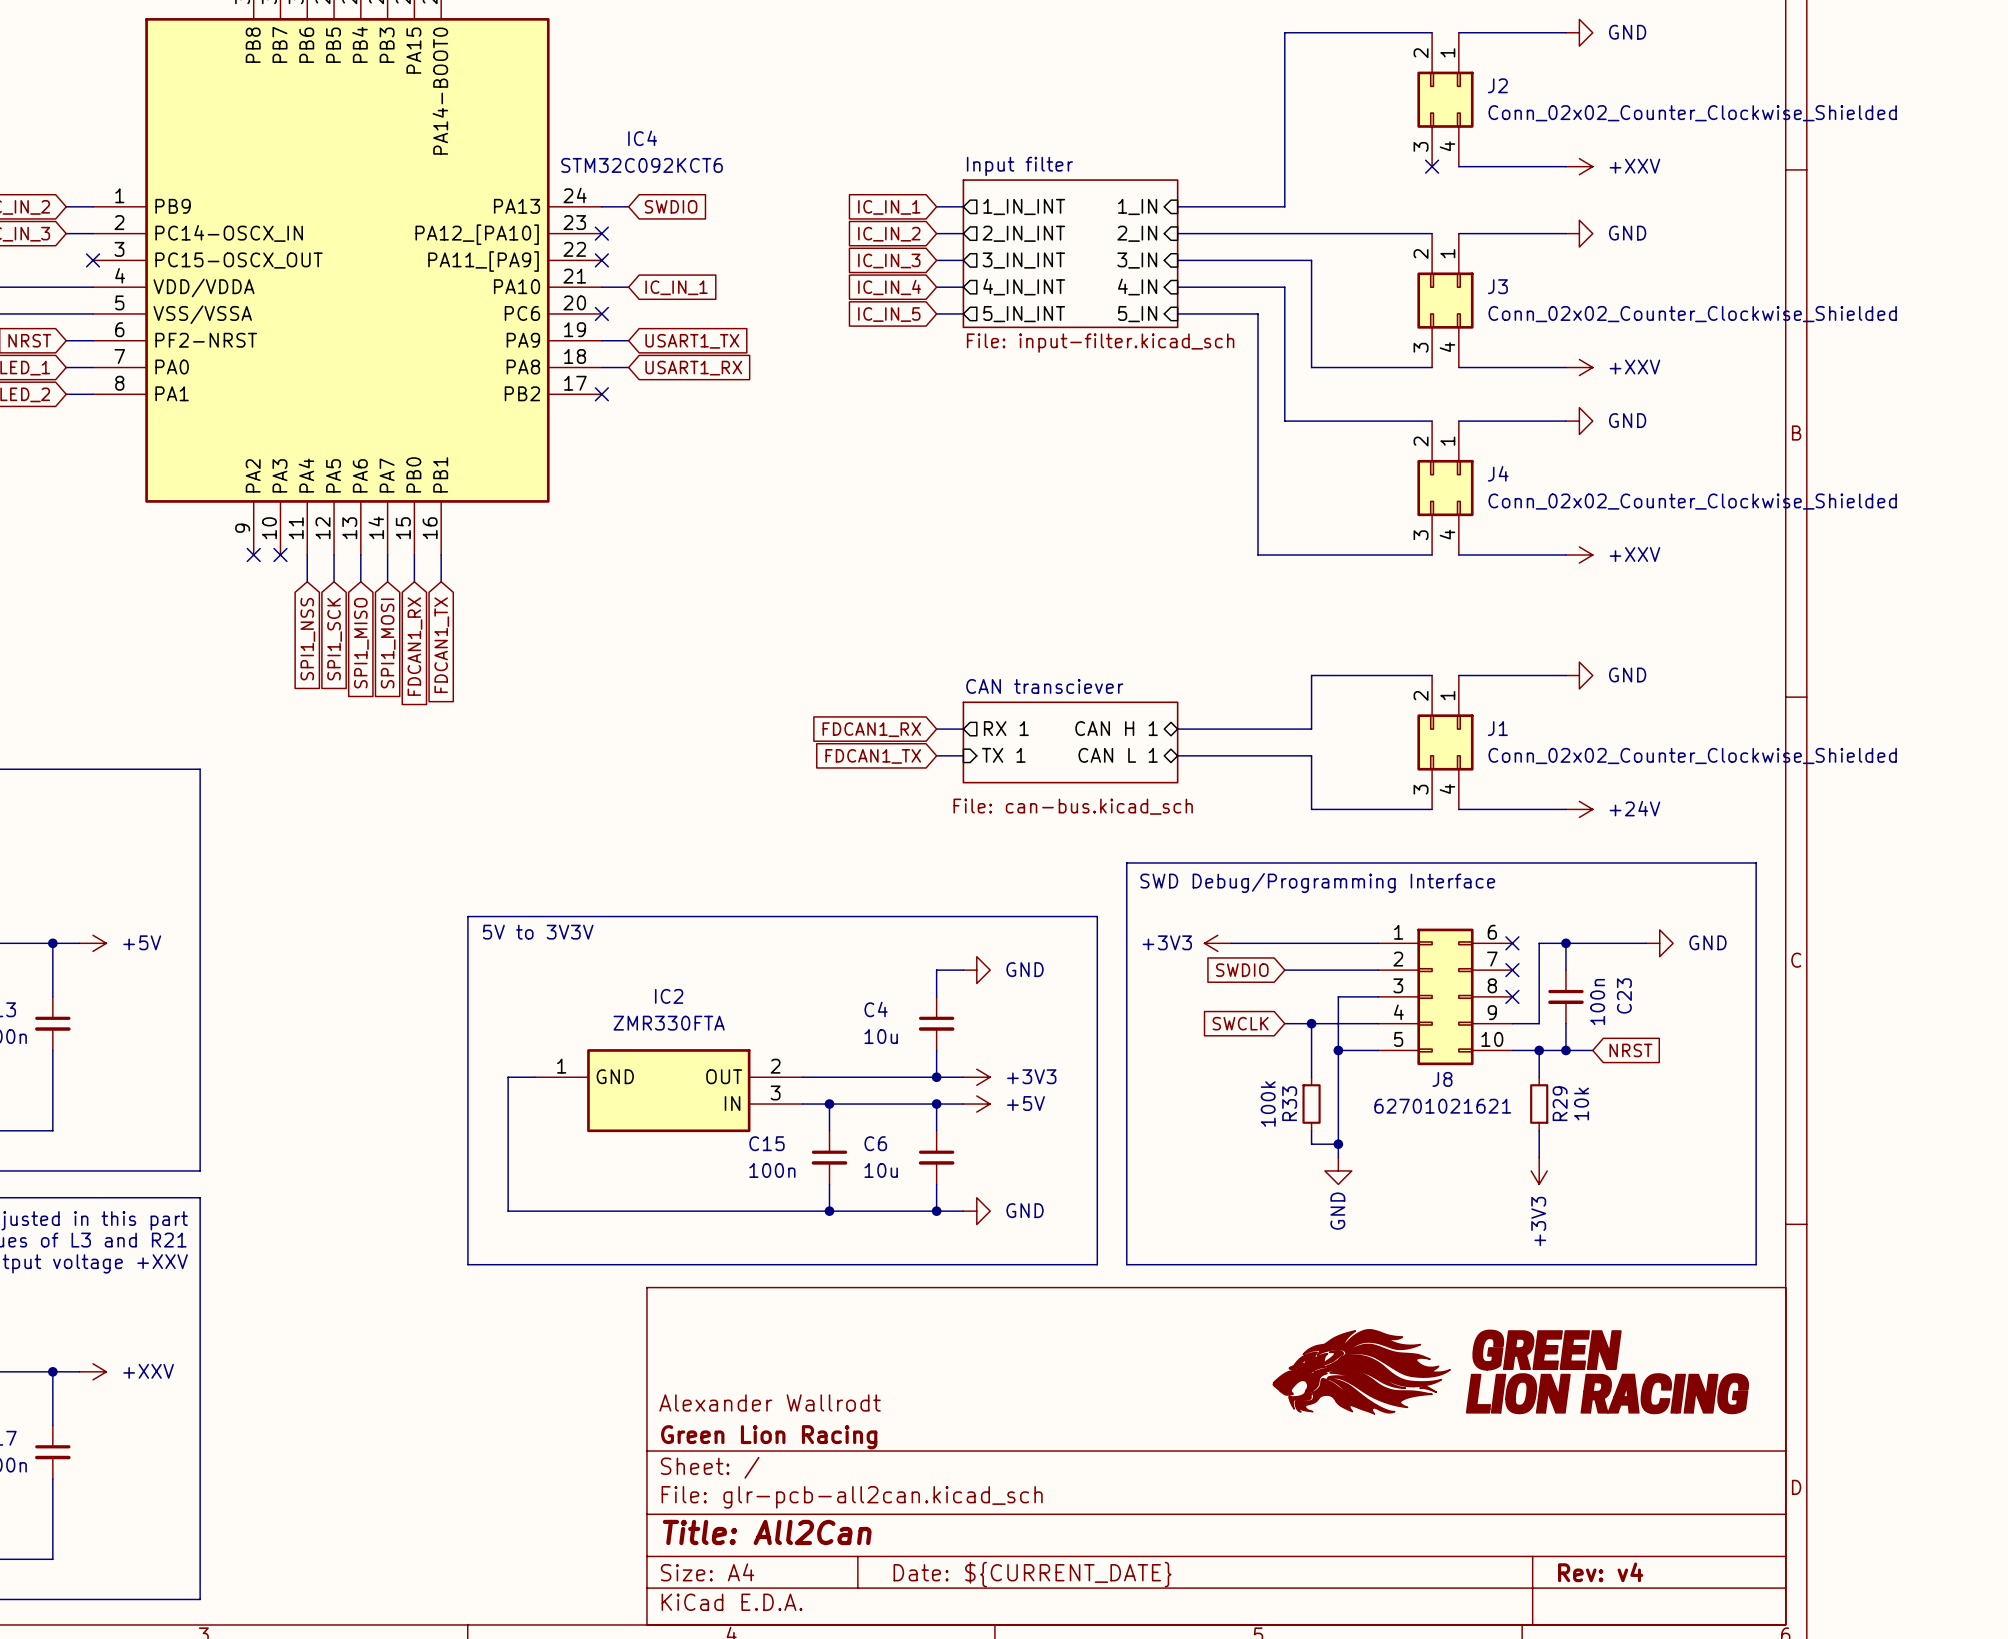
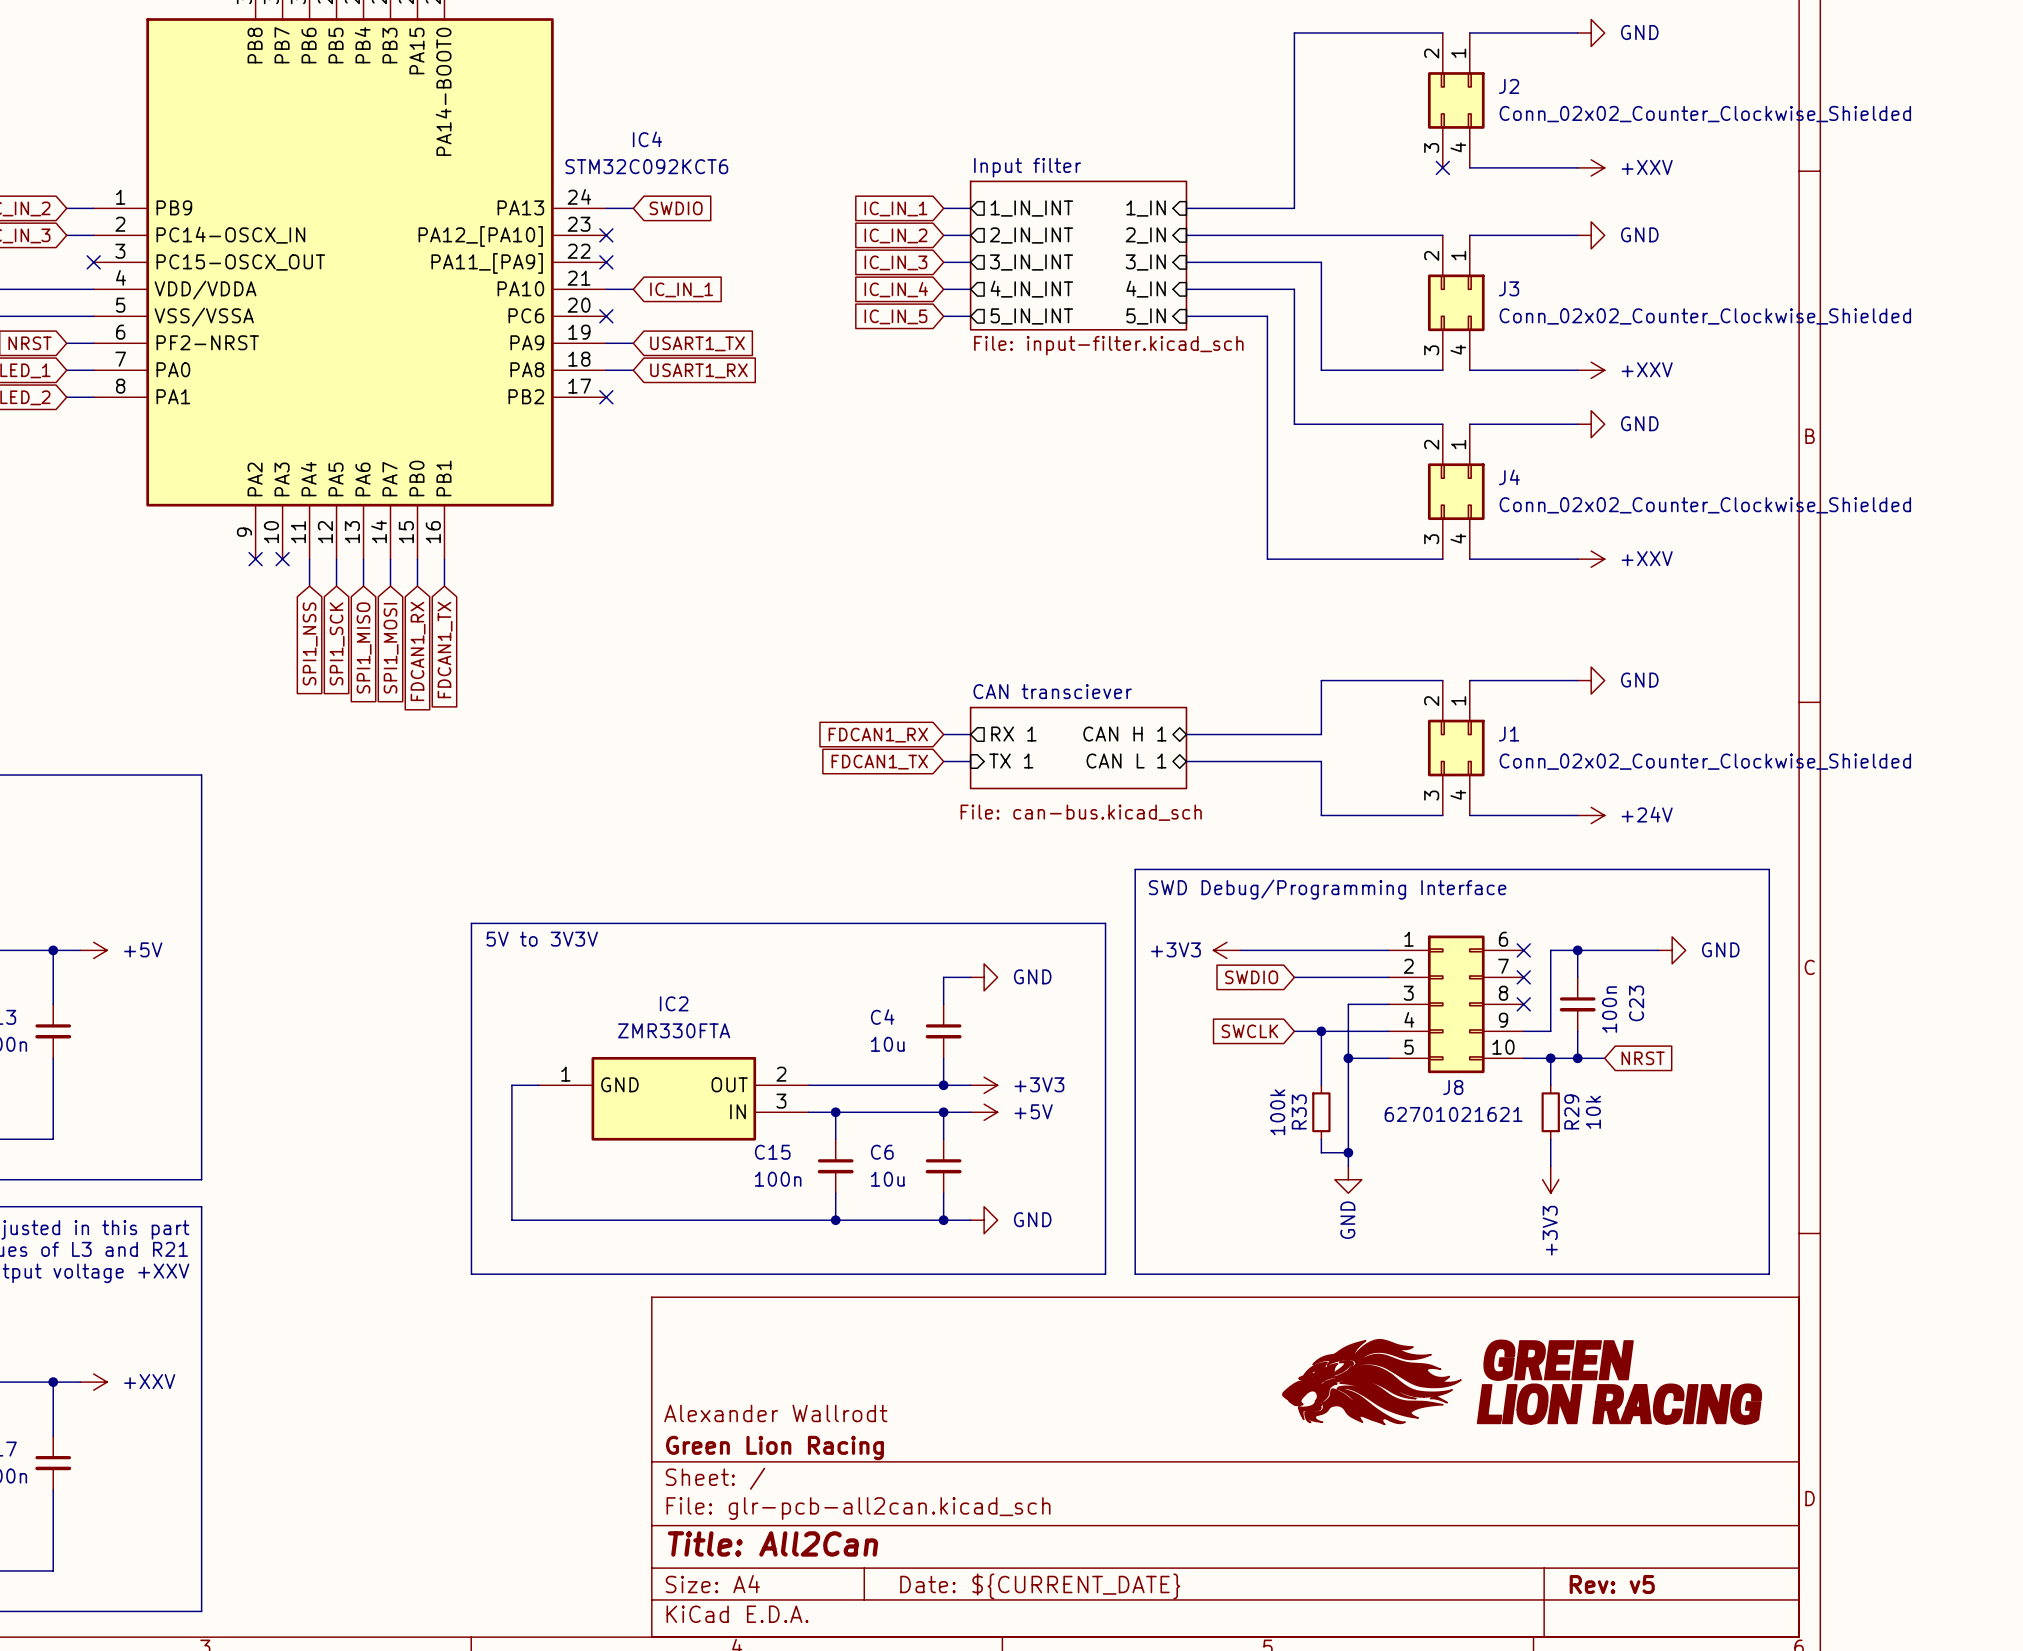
title block: Rev: v4 (1600, 1572) -> Rev: v5 (1612, 1584)

